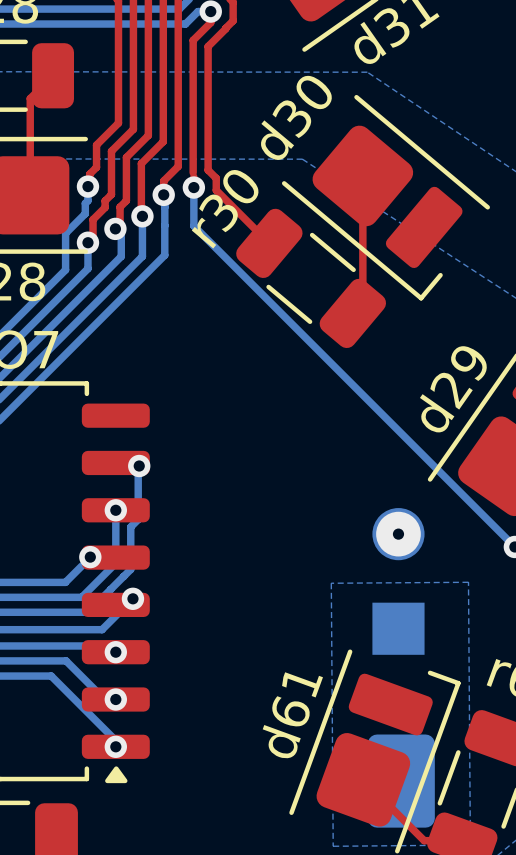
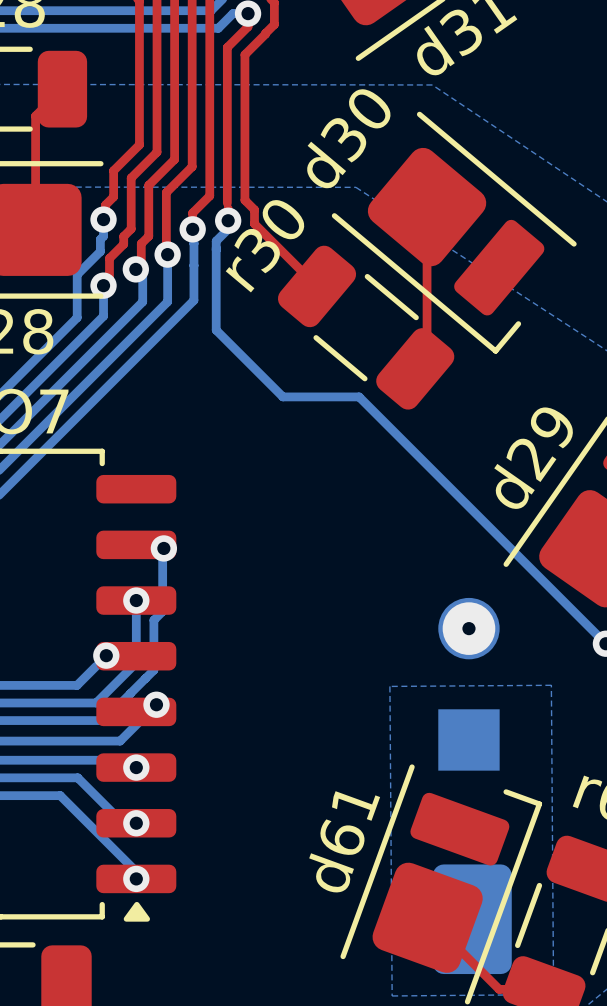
bottom track: (193, 194) (193, 225) (305, 337) -> (228, 229) (216, 241) (216, 330) (282, 396) (359, 396)

